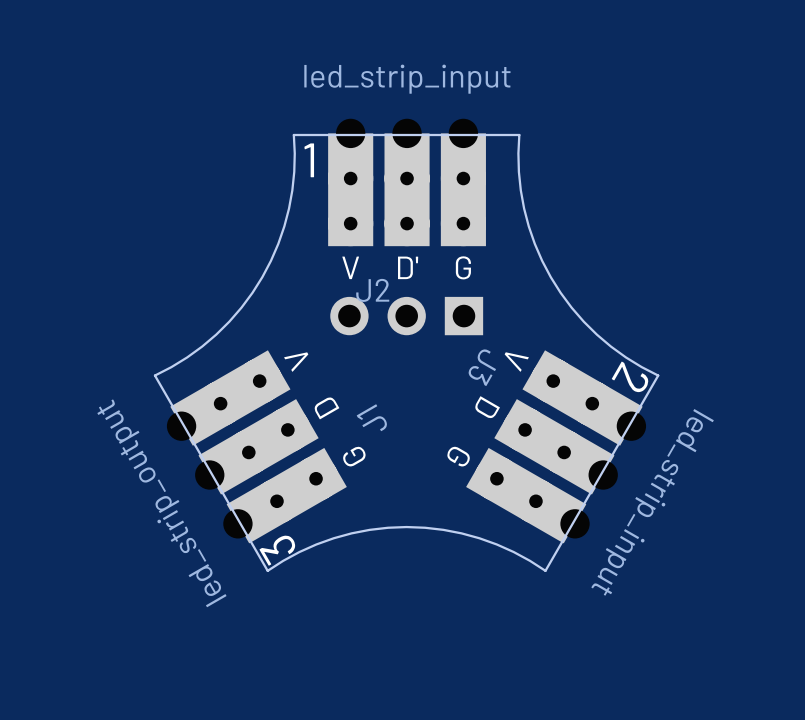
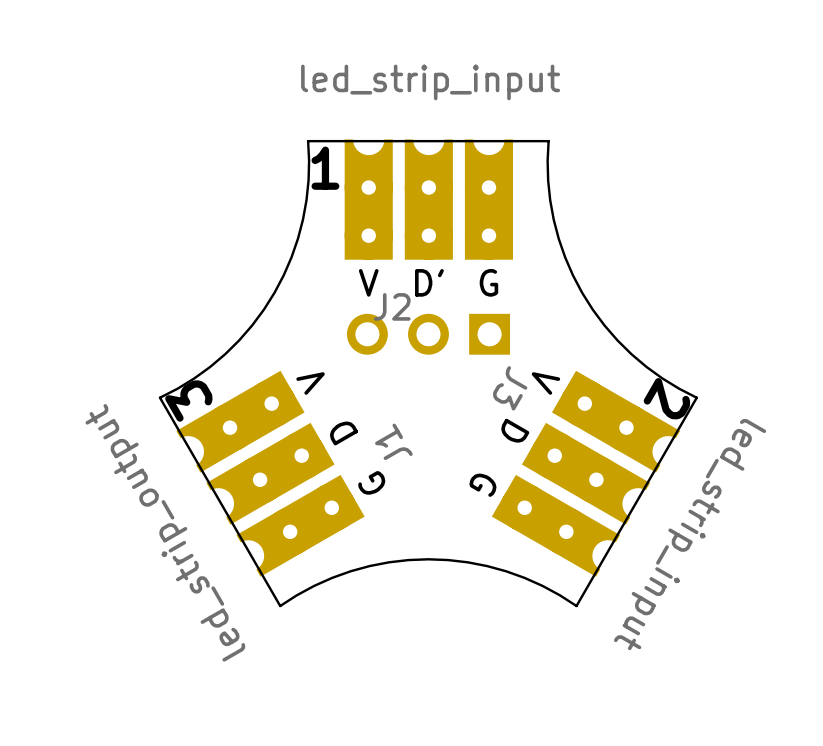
text position: 3 (277, 550) -> 3 (188, 401)

